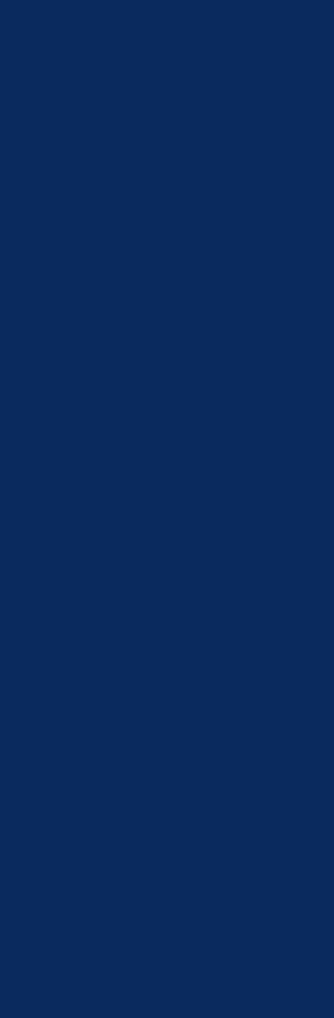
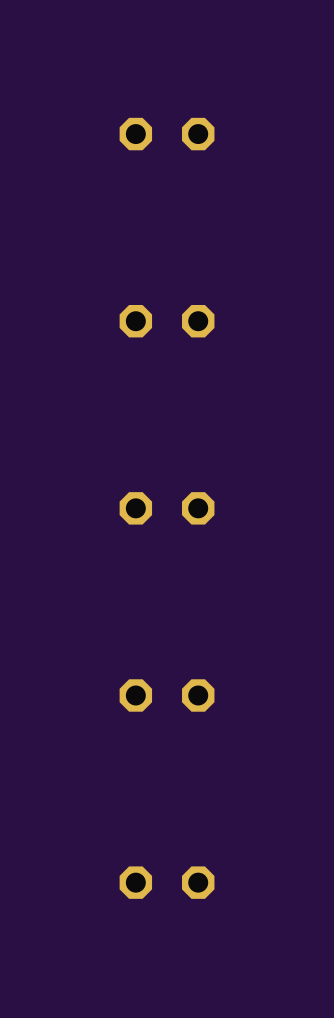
part: none -> (167, 134)
part: none -> (167, 321)
part: none -> (167, 508)
part: none -> (167, 695)
part: none -> (167, 882)

